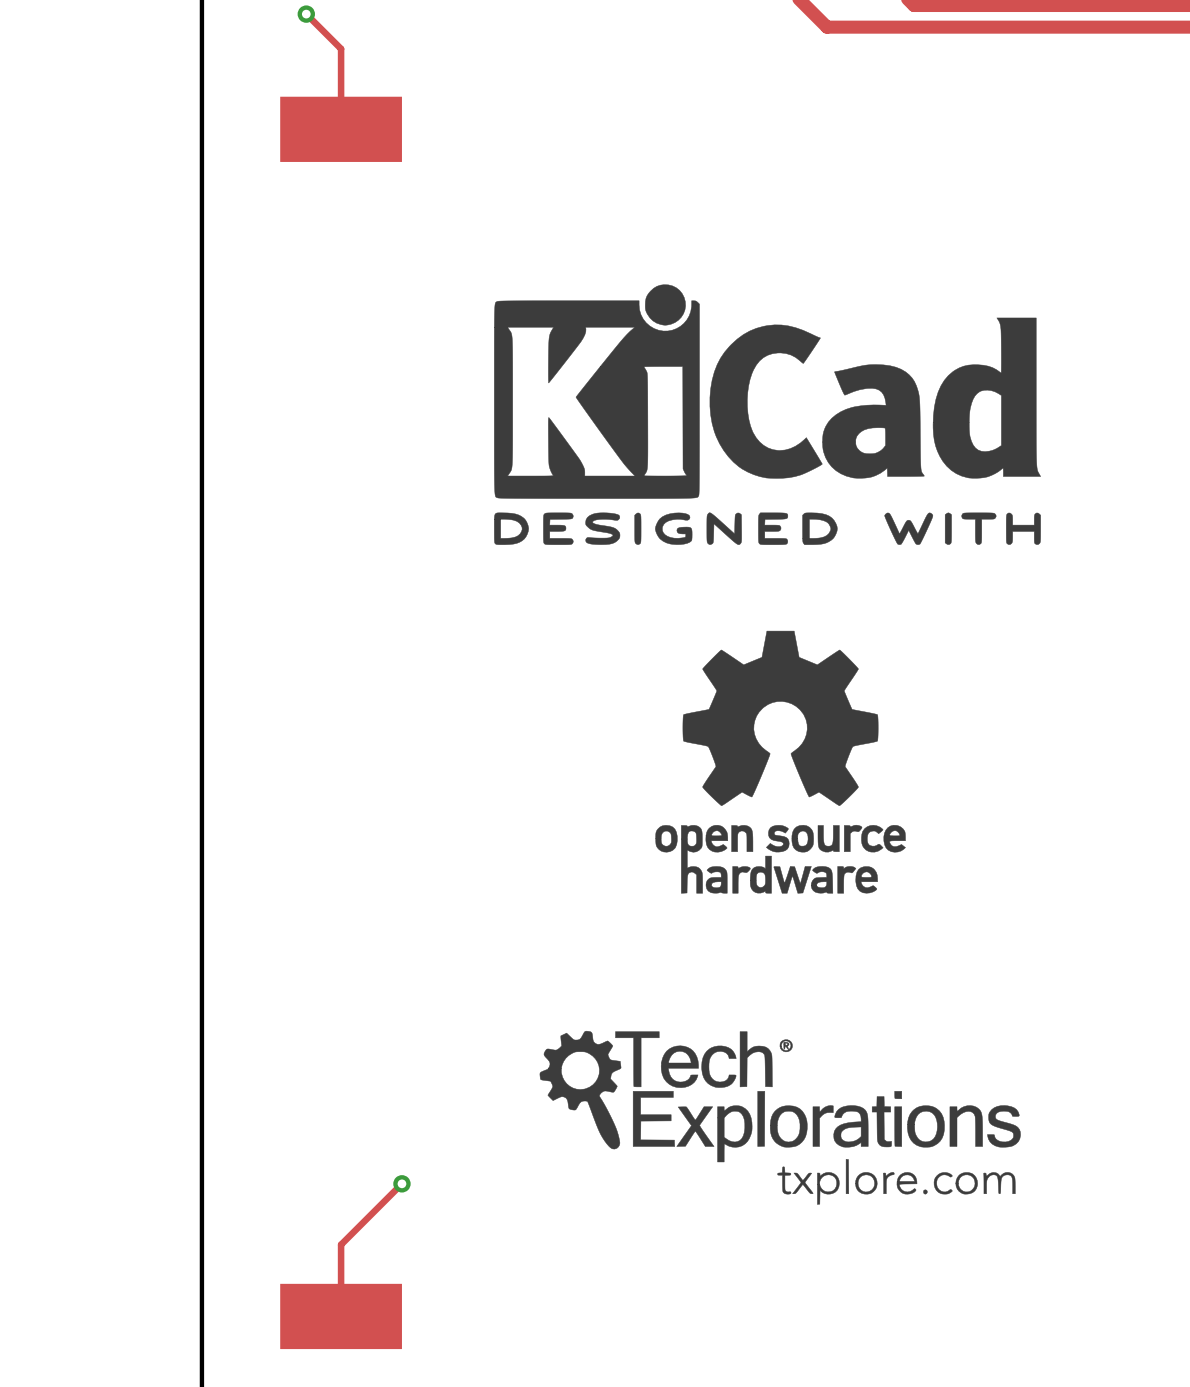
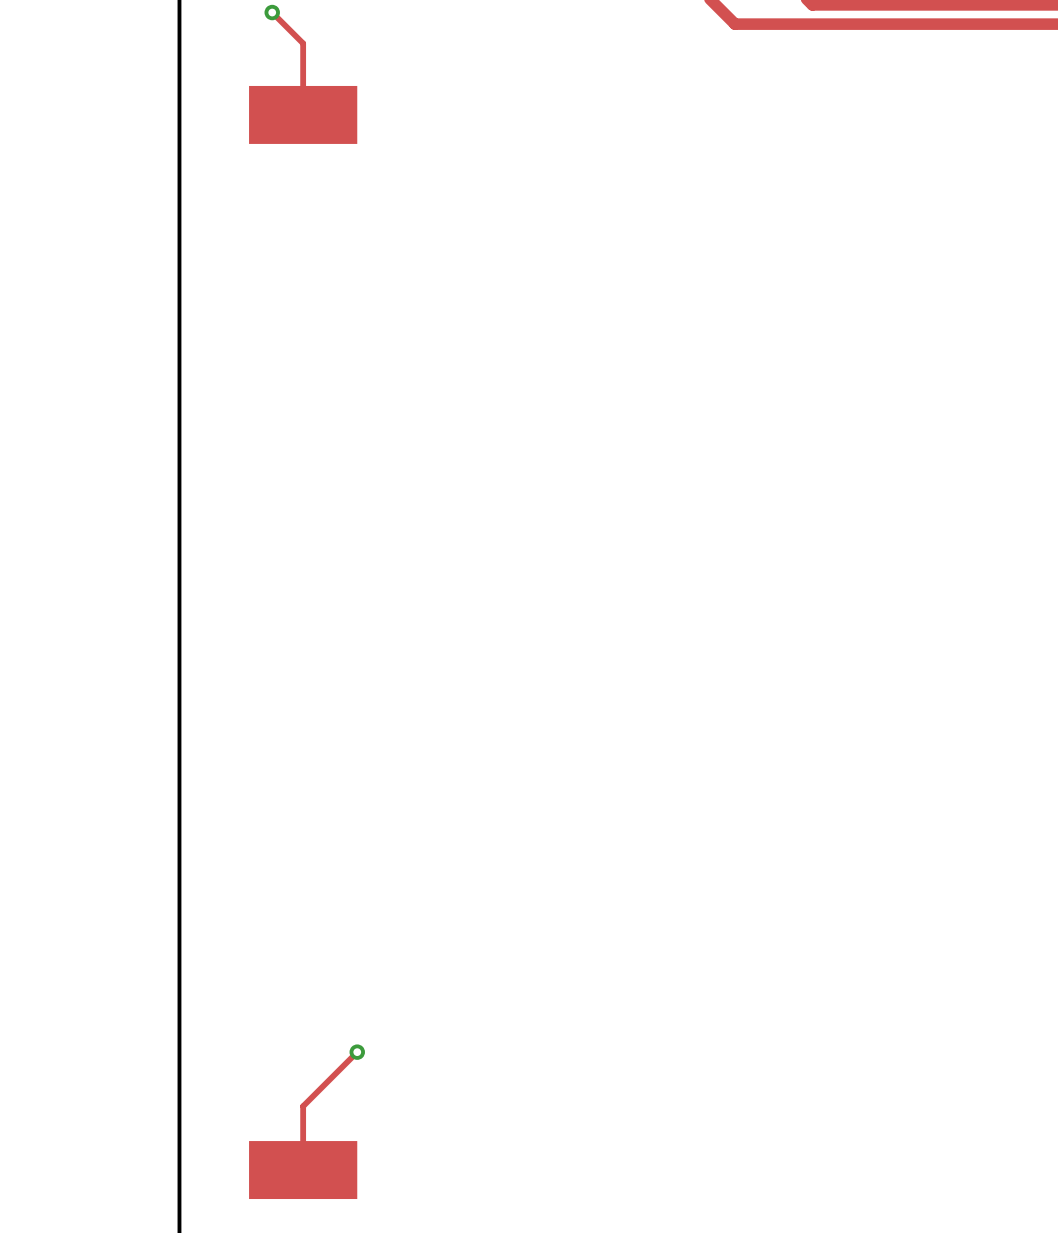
drawing: [494, 284, 1041, 545] -> none
drawing: [655, 630, 906, 894] -> none
drawing: [539, 1030, 1021, 1205] -> none

